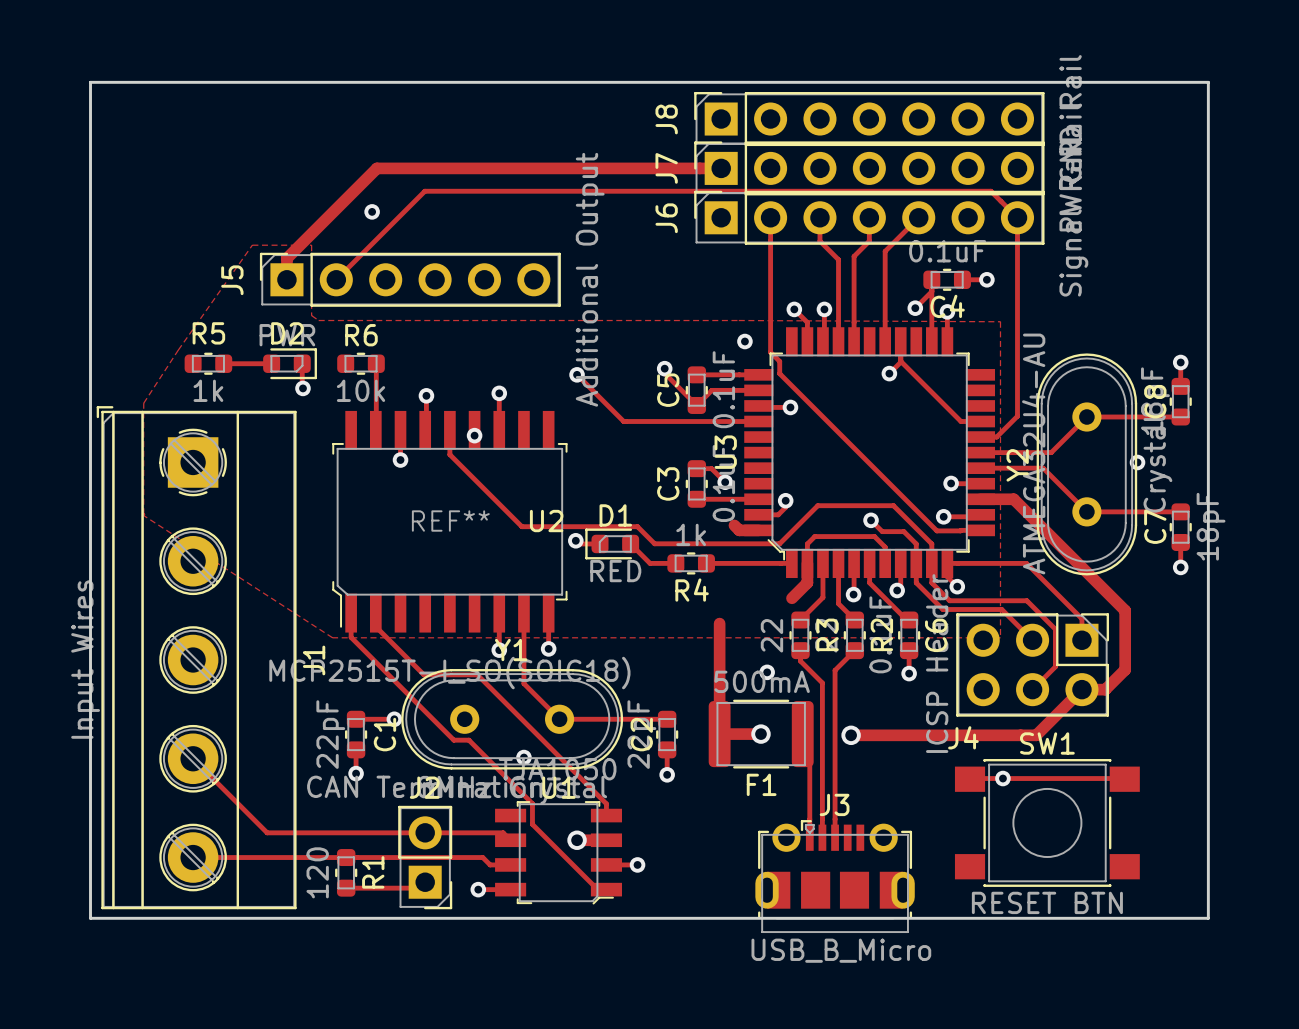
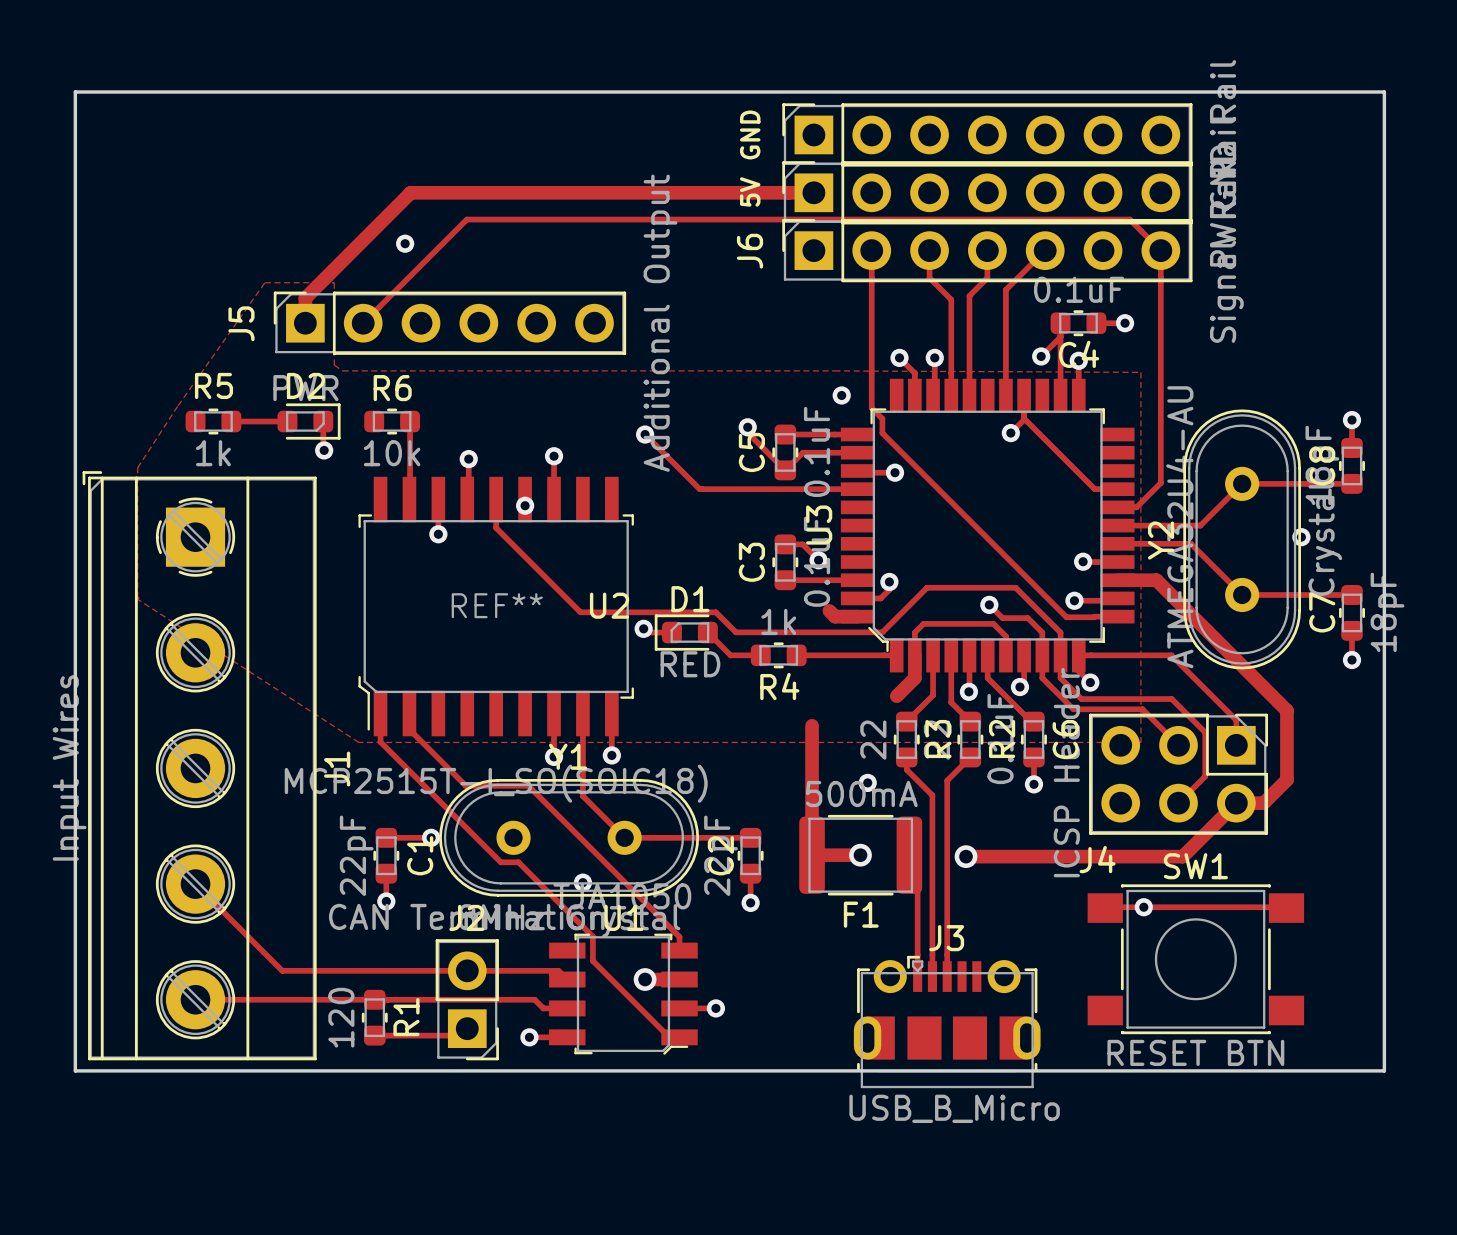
J8 name: J8 (666, 119) -> GND (750, 134)
J7 name: J7 (666, 168) -> 5V (750, 191)

